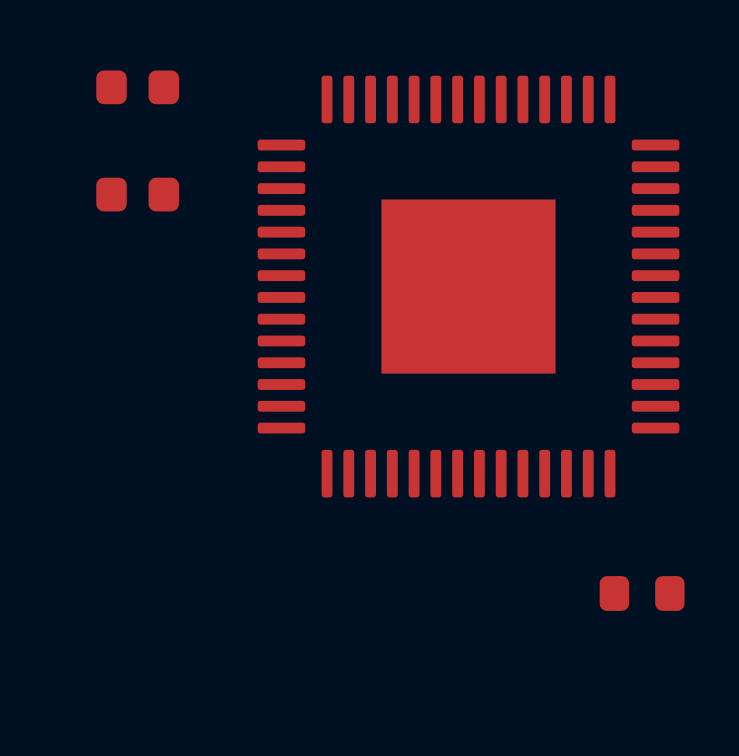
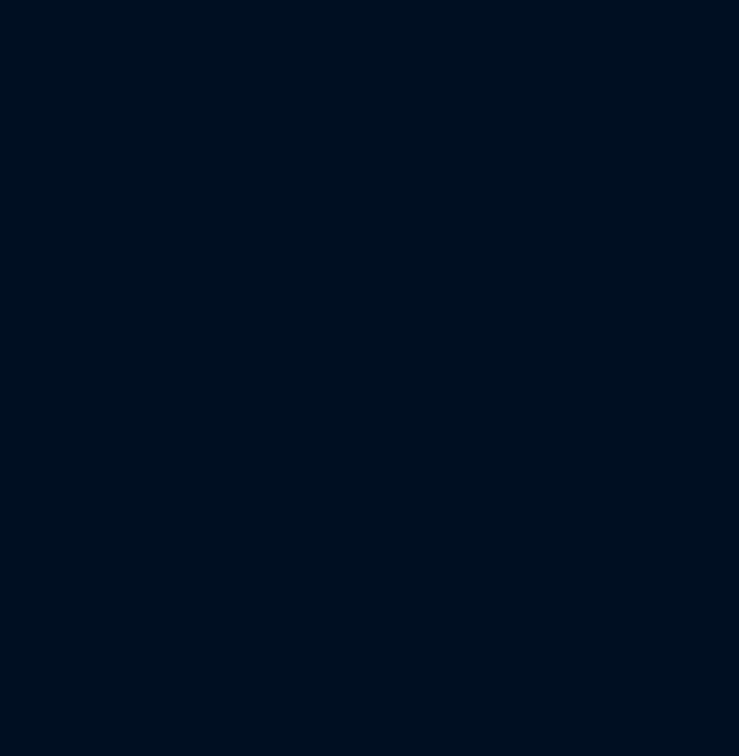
part: (137, 87) -> none
part: (137, 194) -> none
part: (468, 286) -> none
part: (642, 593) -> none

